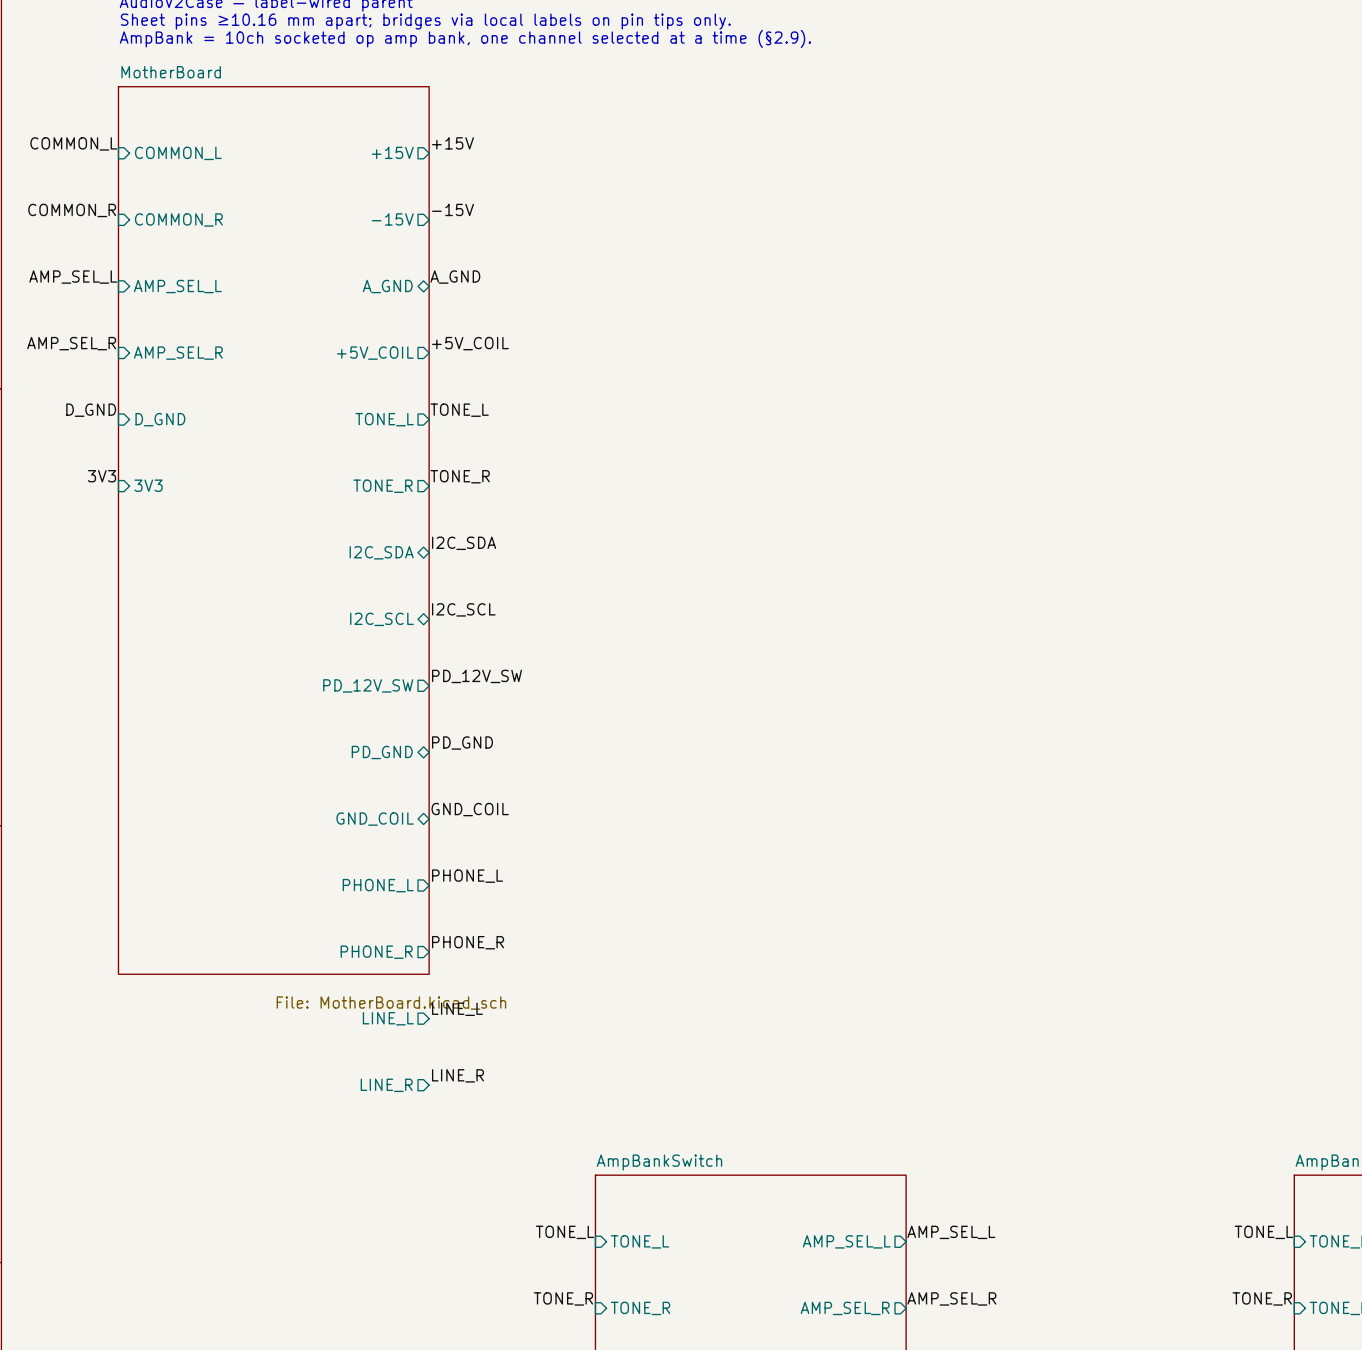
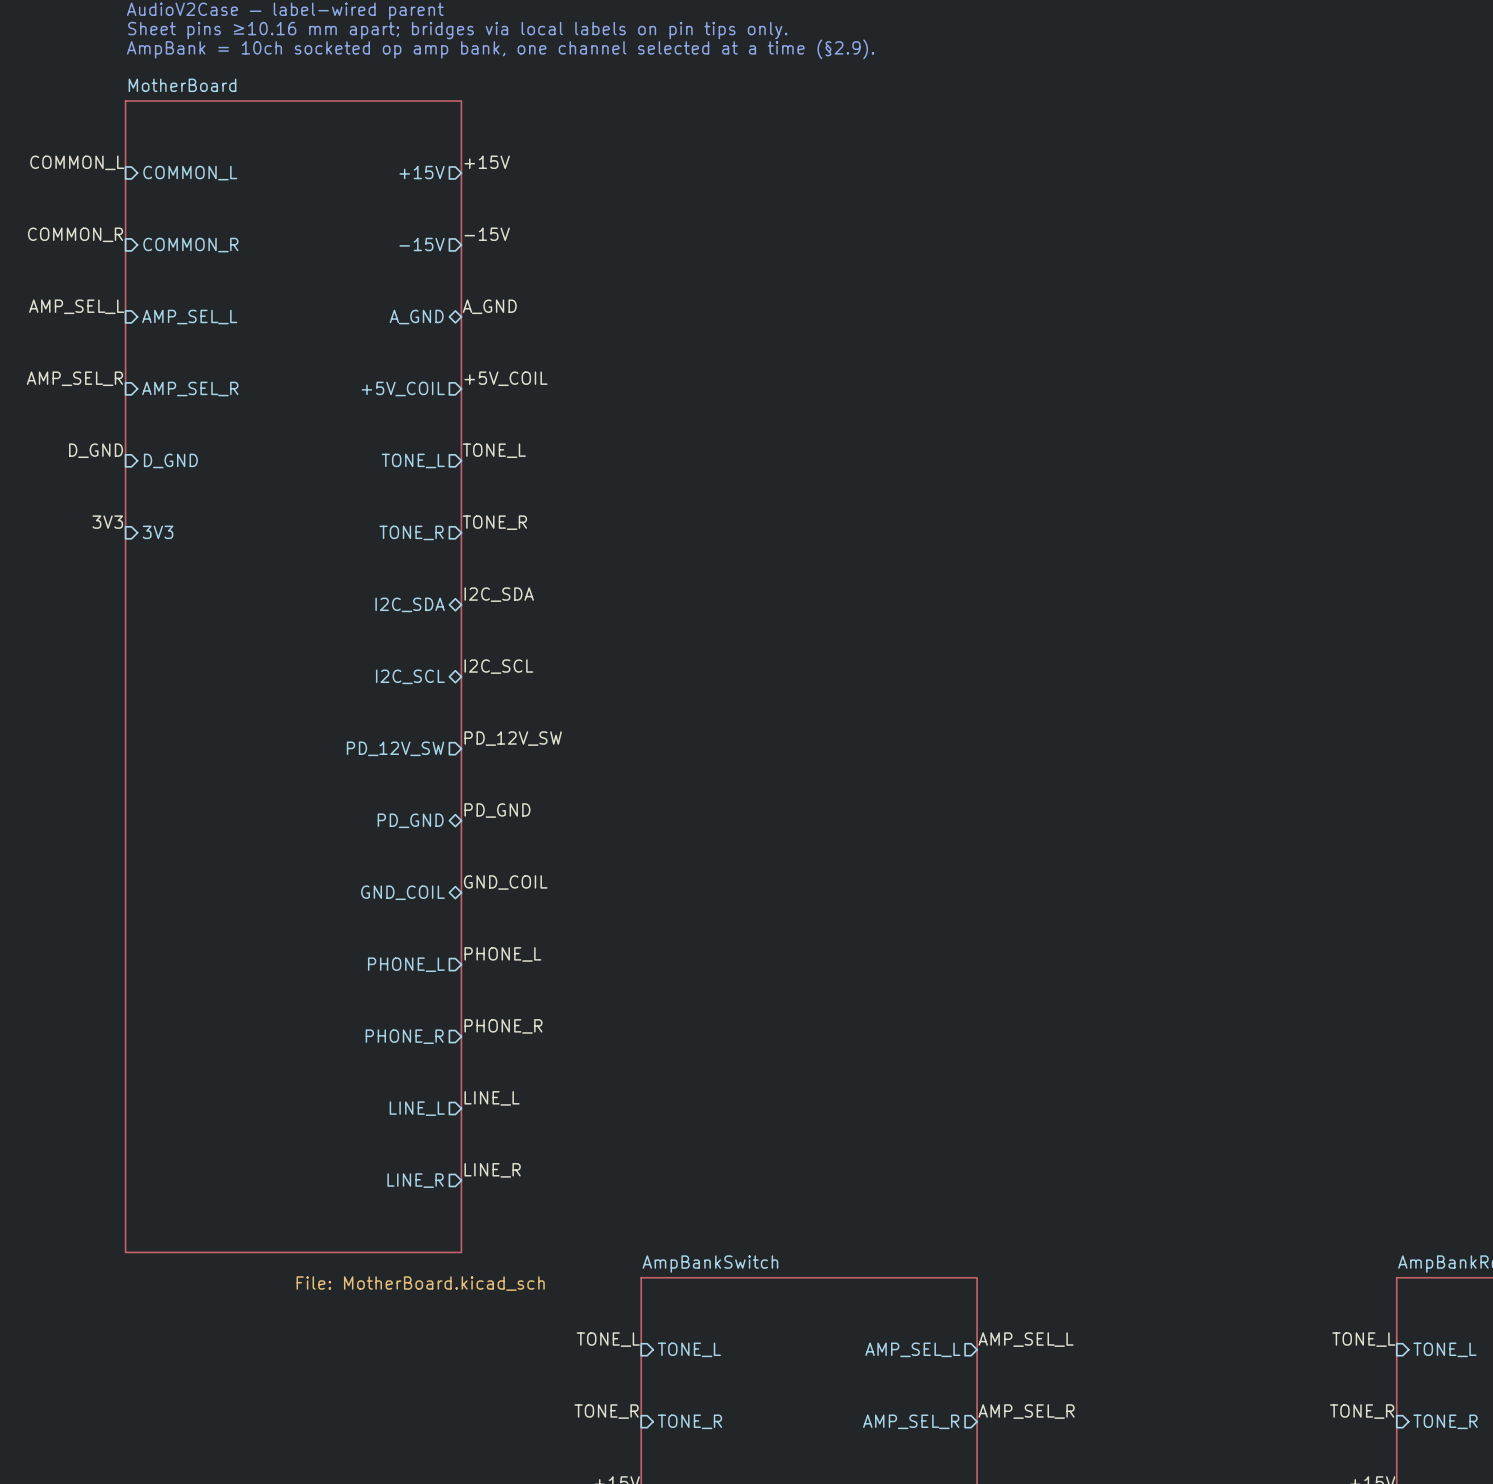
sheet MotherBoard: File: MotherBoard.kicad_sch (273, 530) -> none
sheet MotherBoard: none -> File: MotherBoard.kicad_sch (293, 676)

